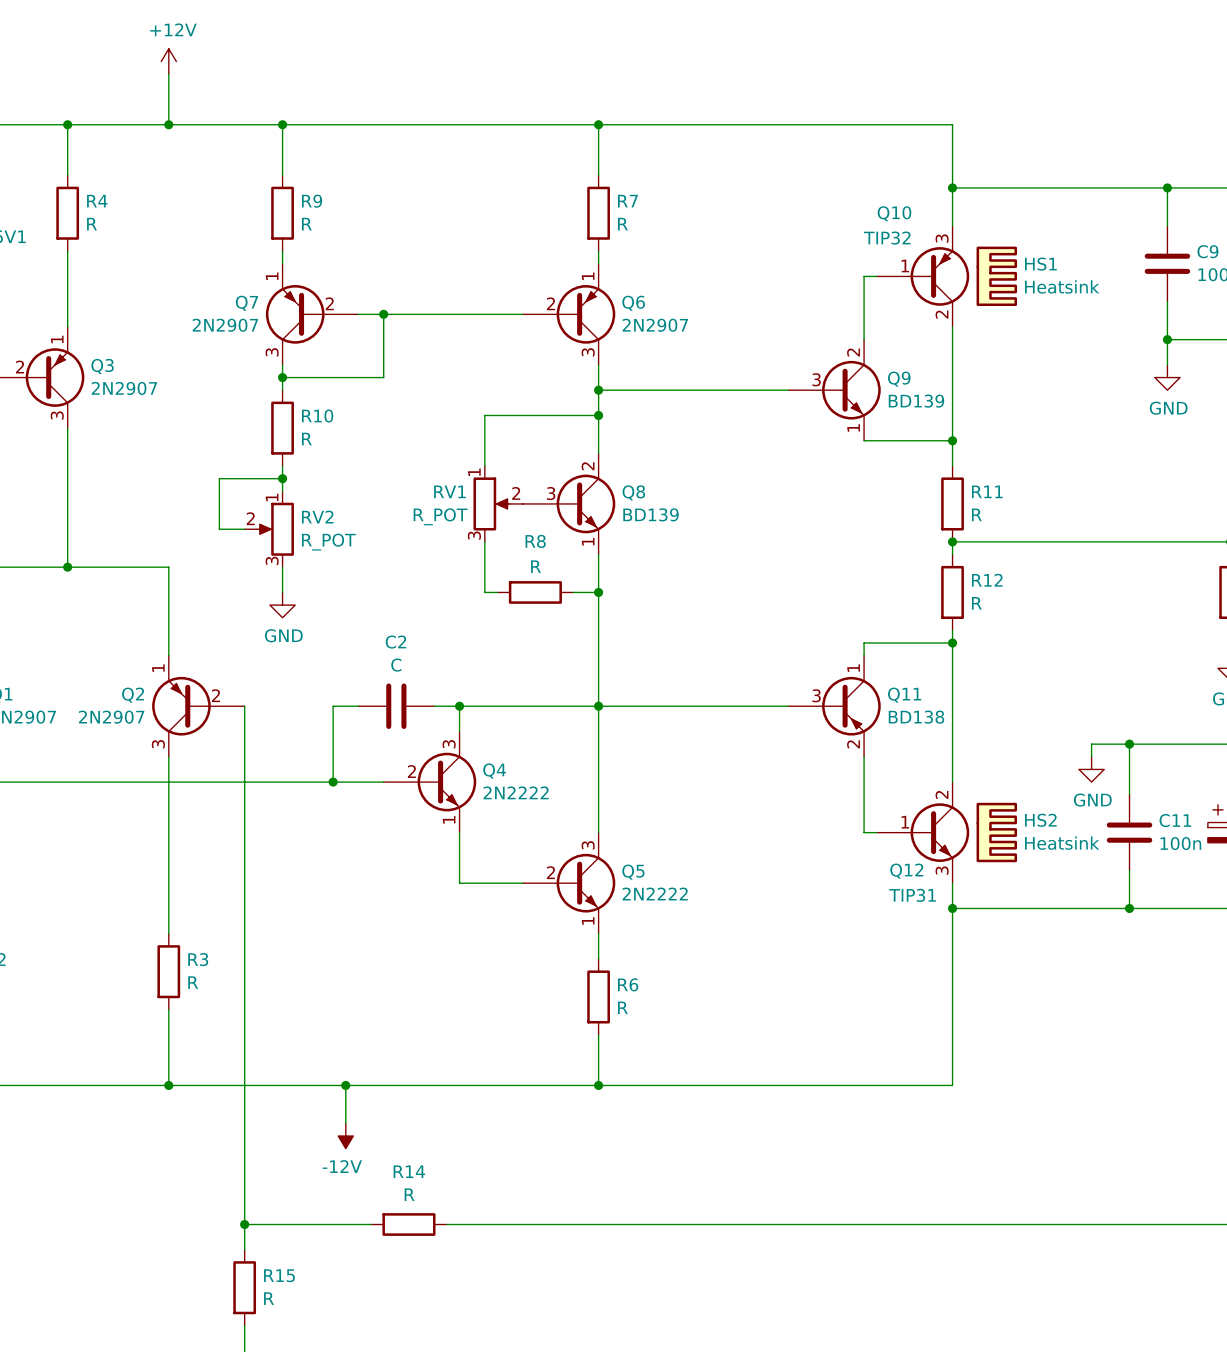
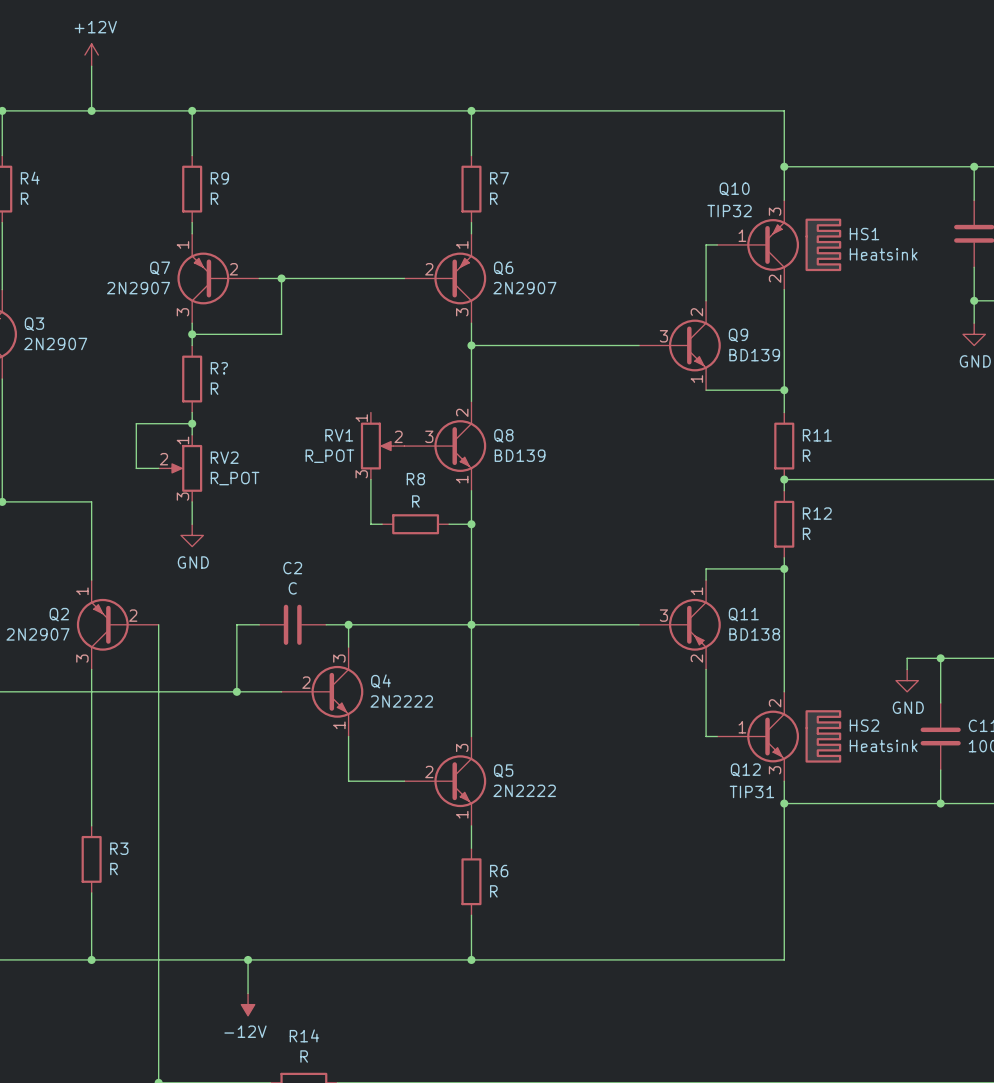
wire: (598, 415) (484, 415) (484, 466) -> none
junction: (598, 415) -> none
R10 name: R10 (317, 416) -> R? (219, 368)

